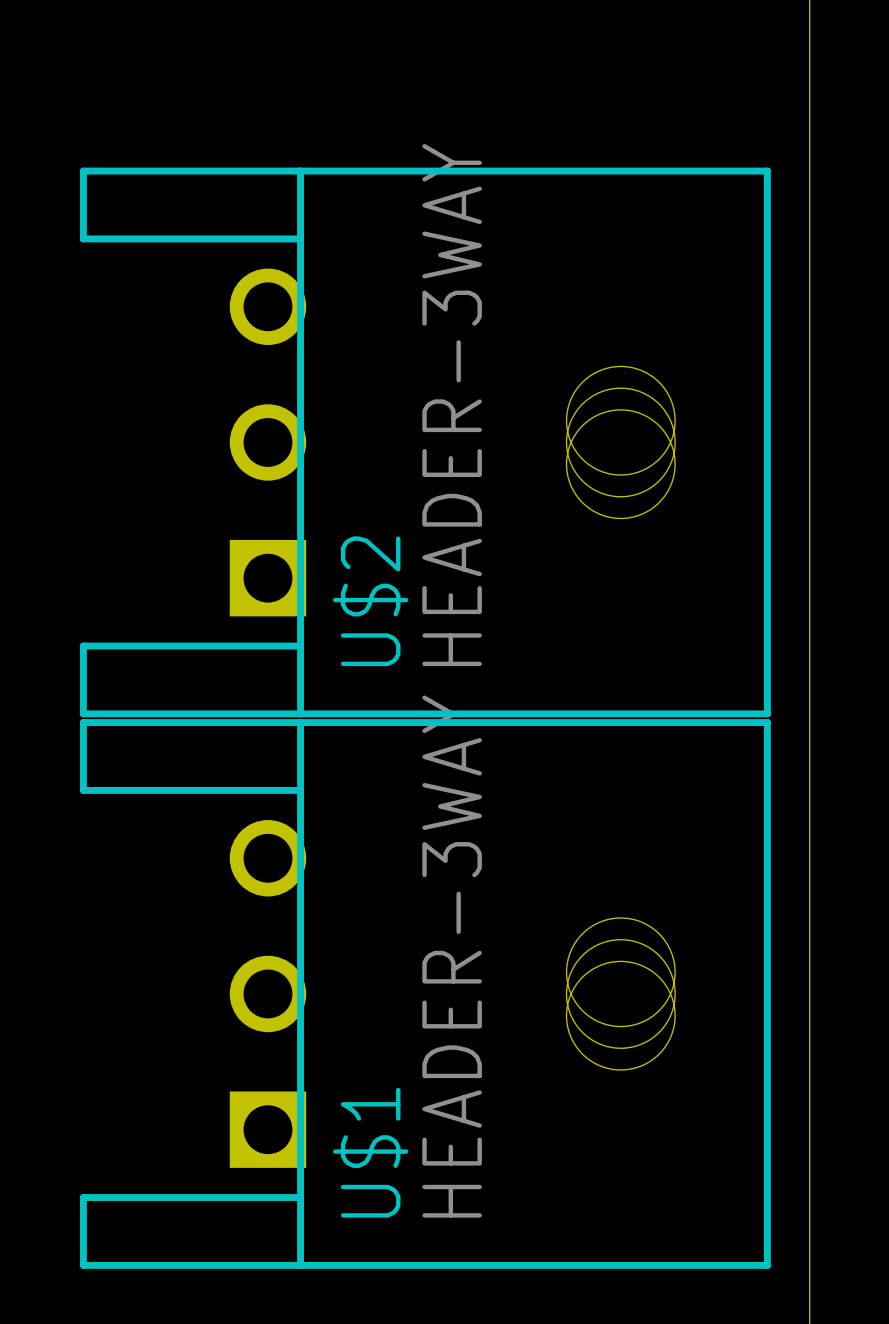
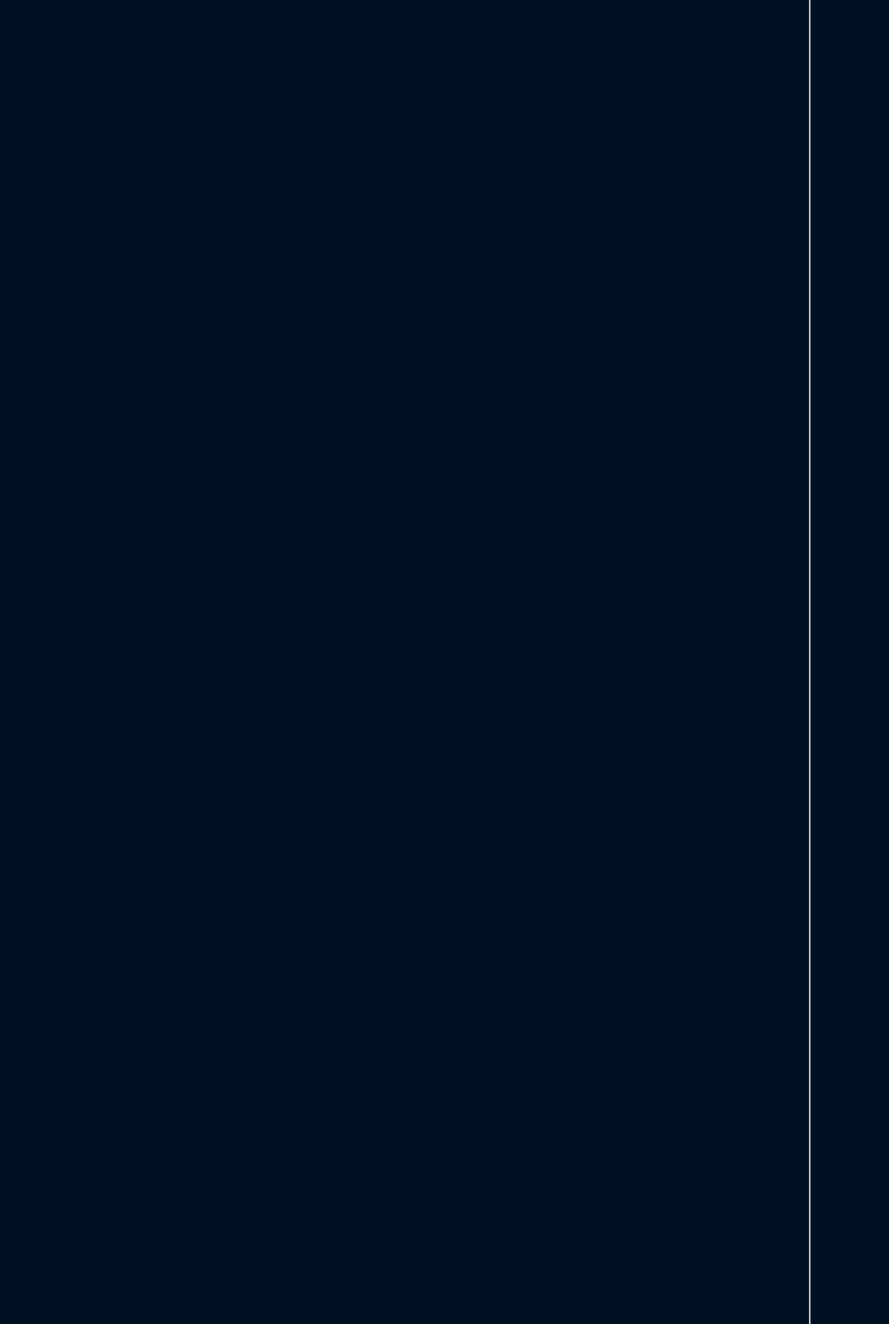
U$2: HEADER-3WAY (425, 442) -> none
U$1: HEADER-3WAY (425, 993) -> none

